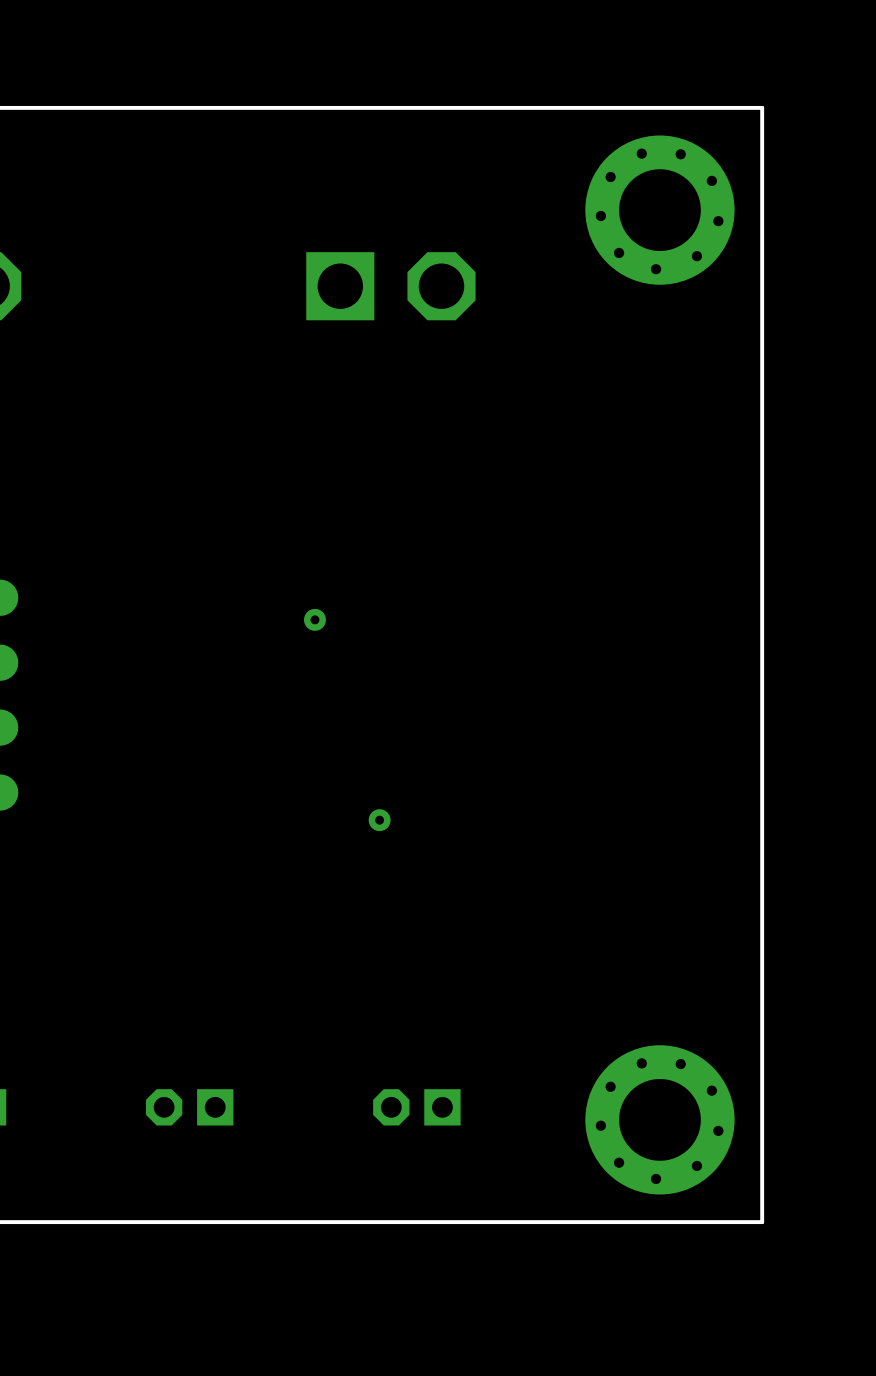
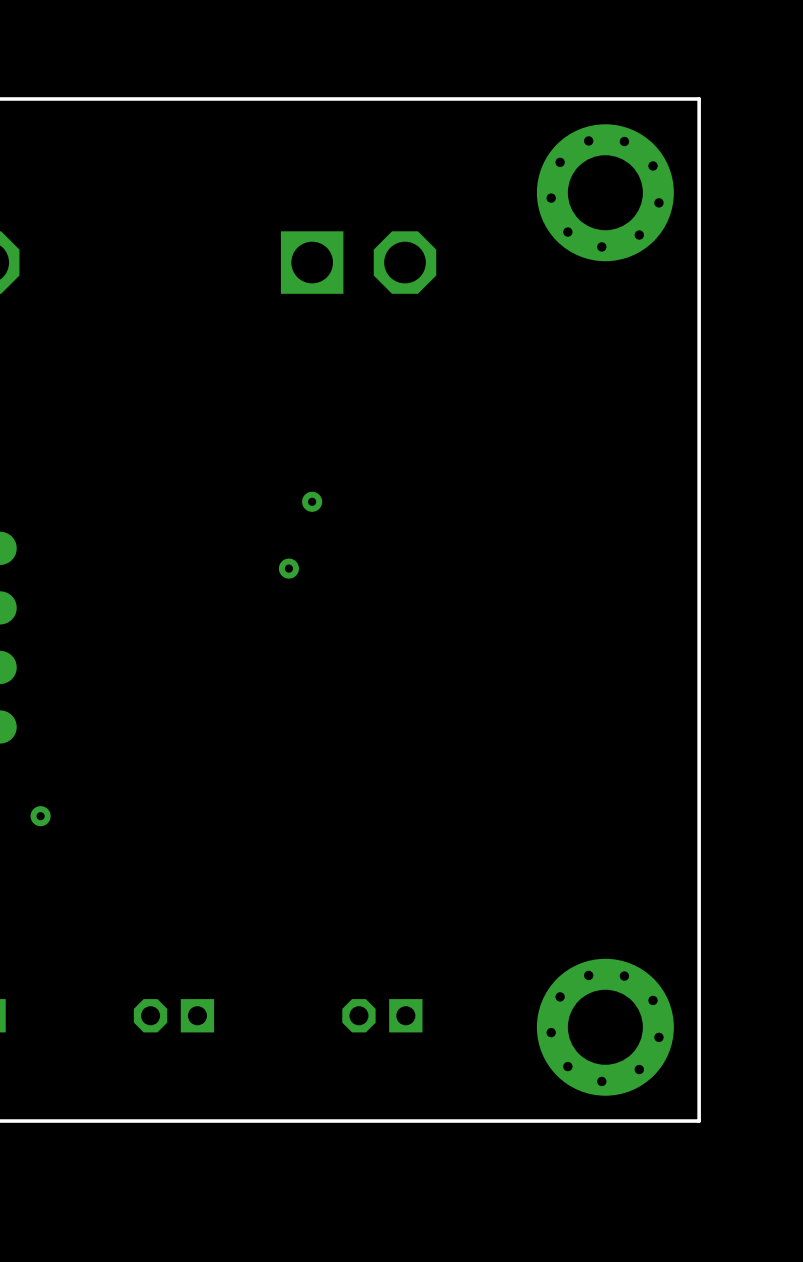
via: none -> (312, 501)
via: (379, 820) -> none
via: none -> (40, 816)

